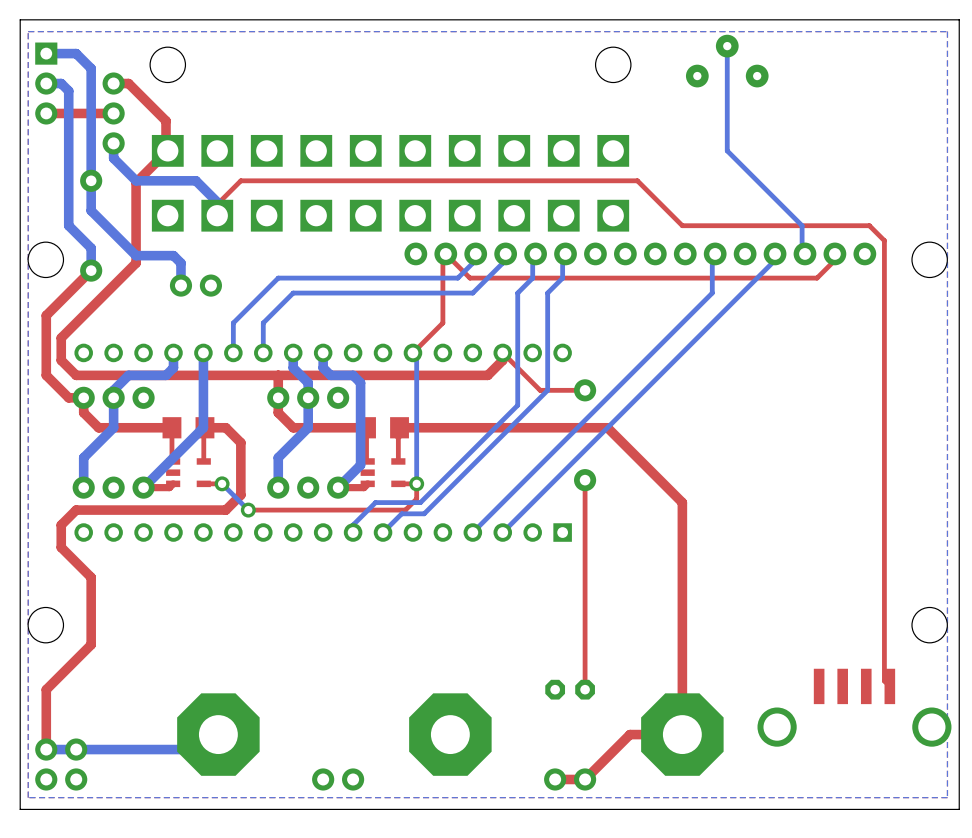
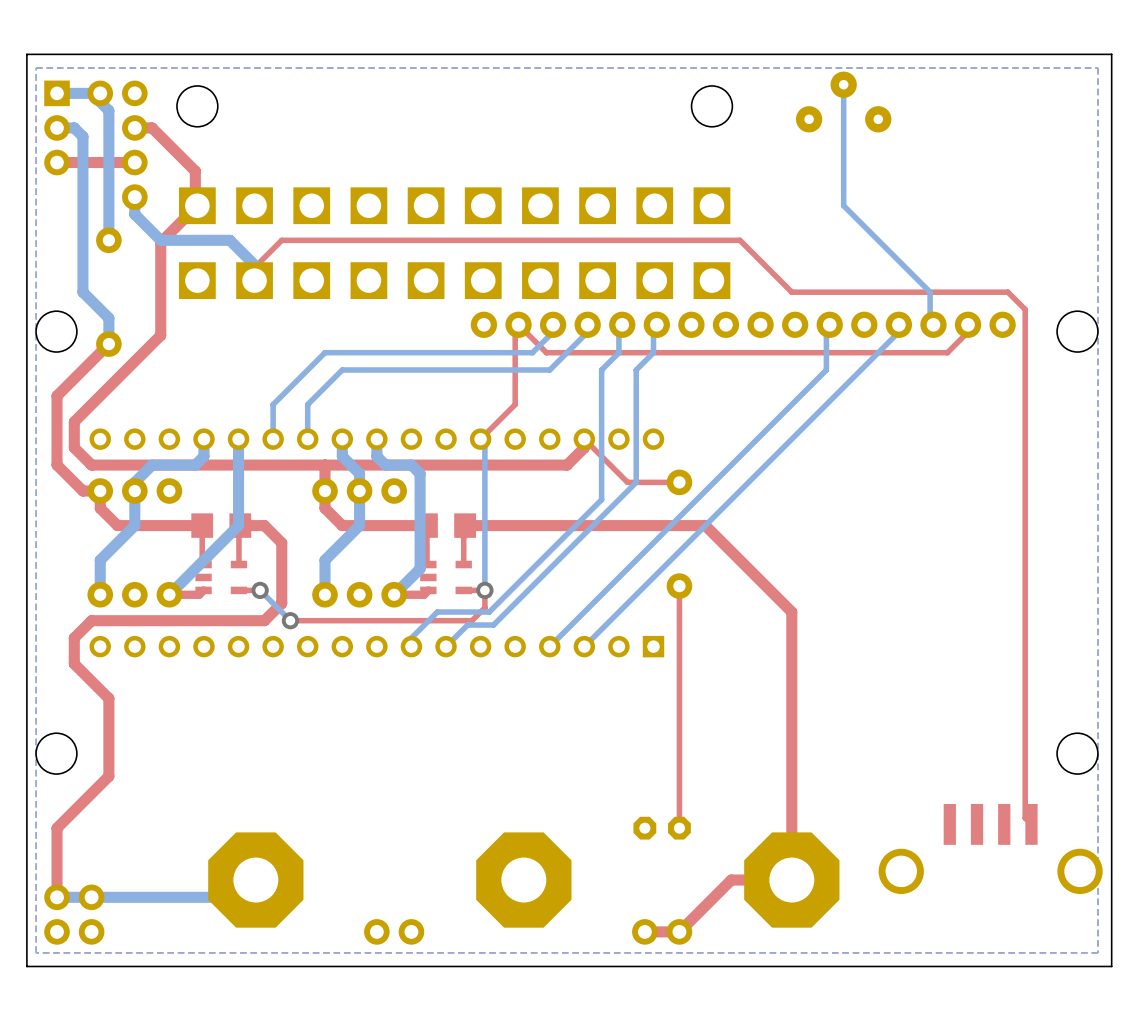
bottom track: (91, 180) (91, 210) (136, 255) (173, 255) (180, 263) (180, 285) -> none
part position: (195, 285) -> (117, 93)

